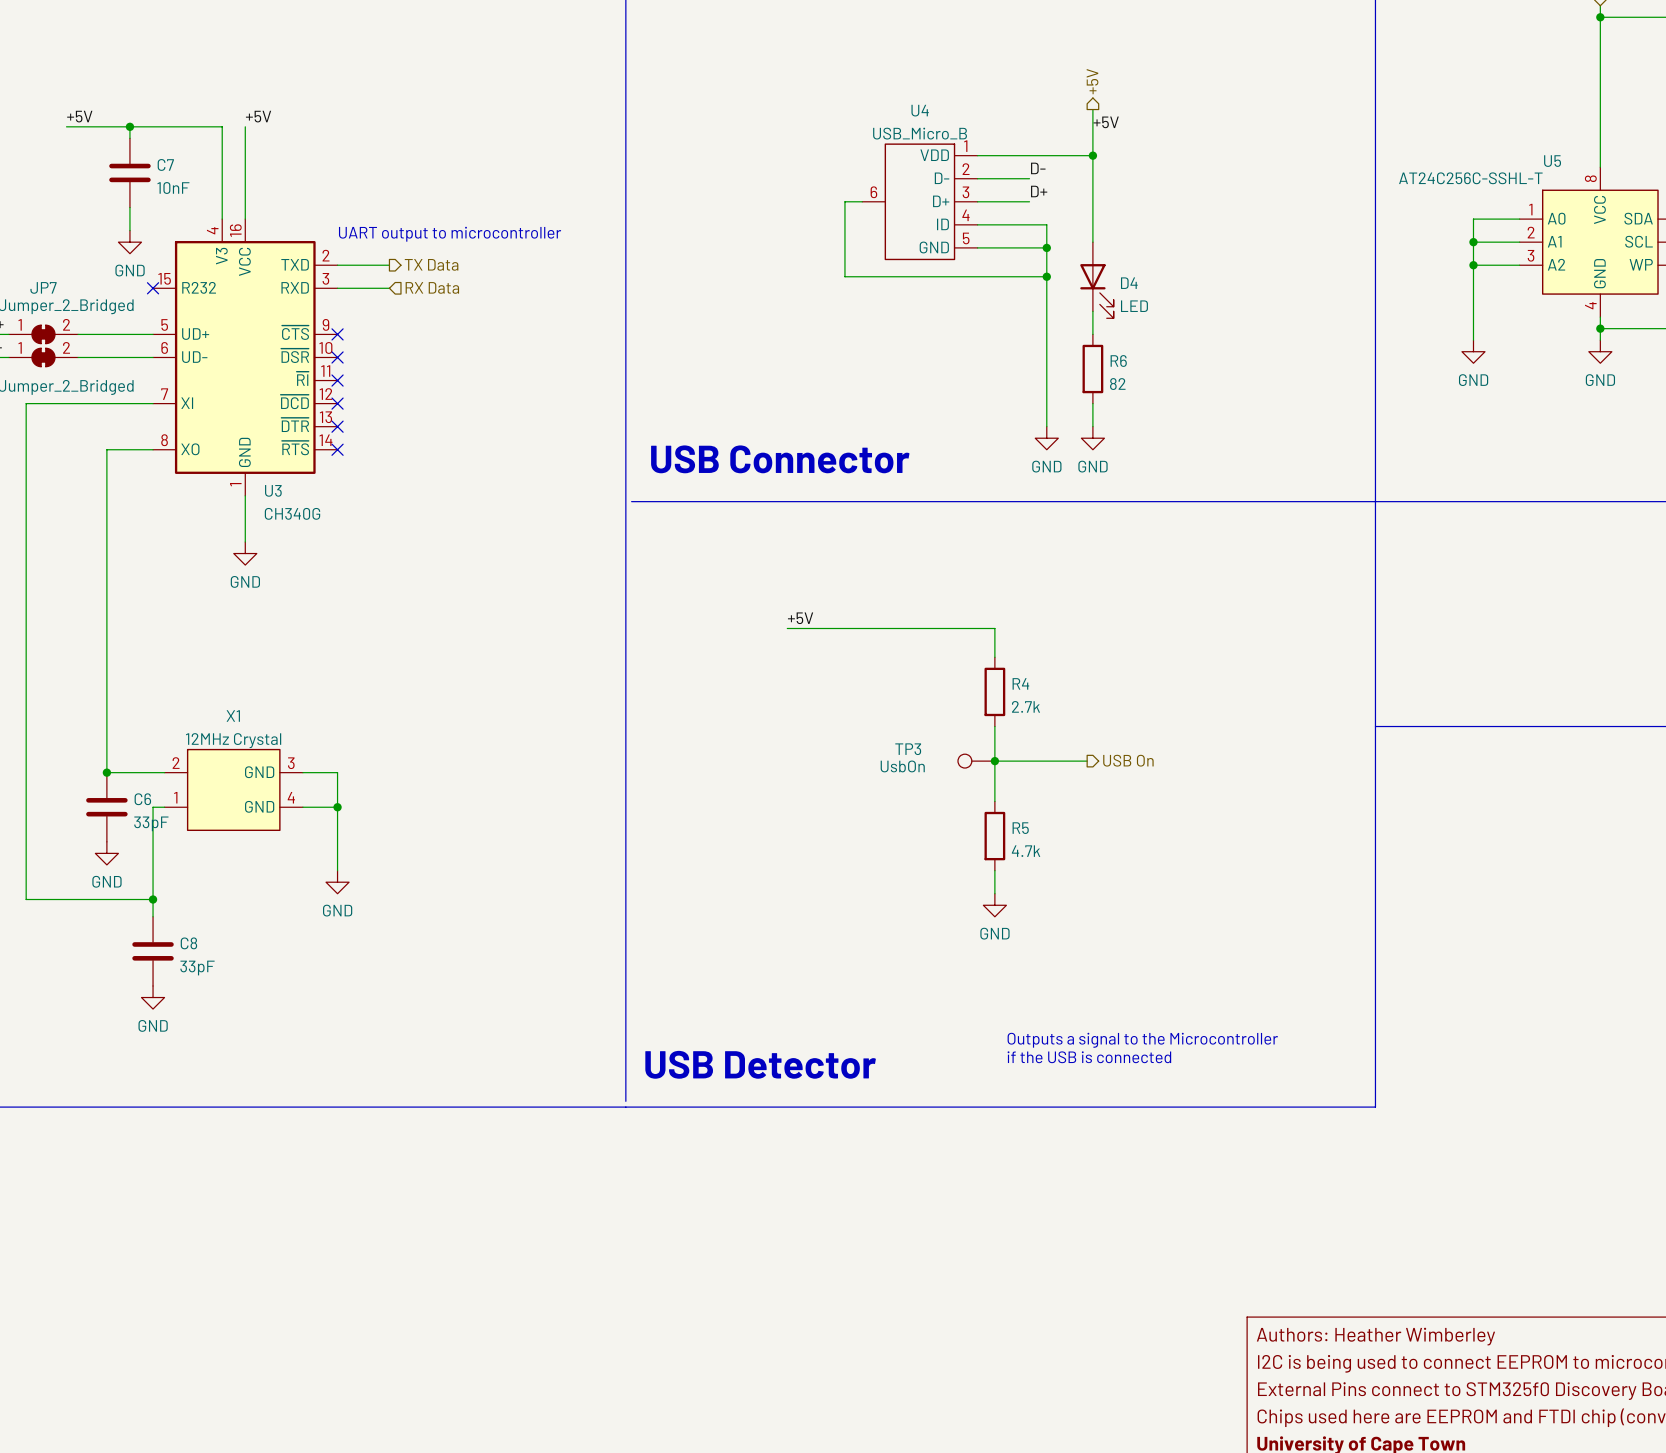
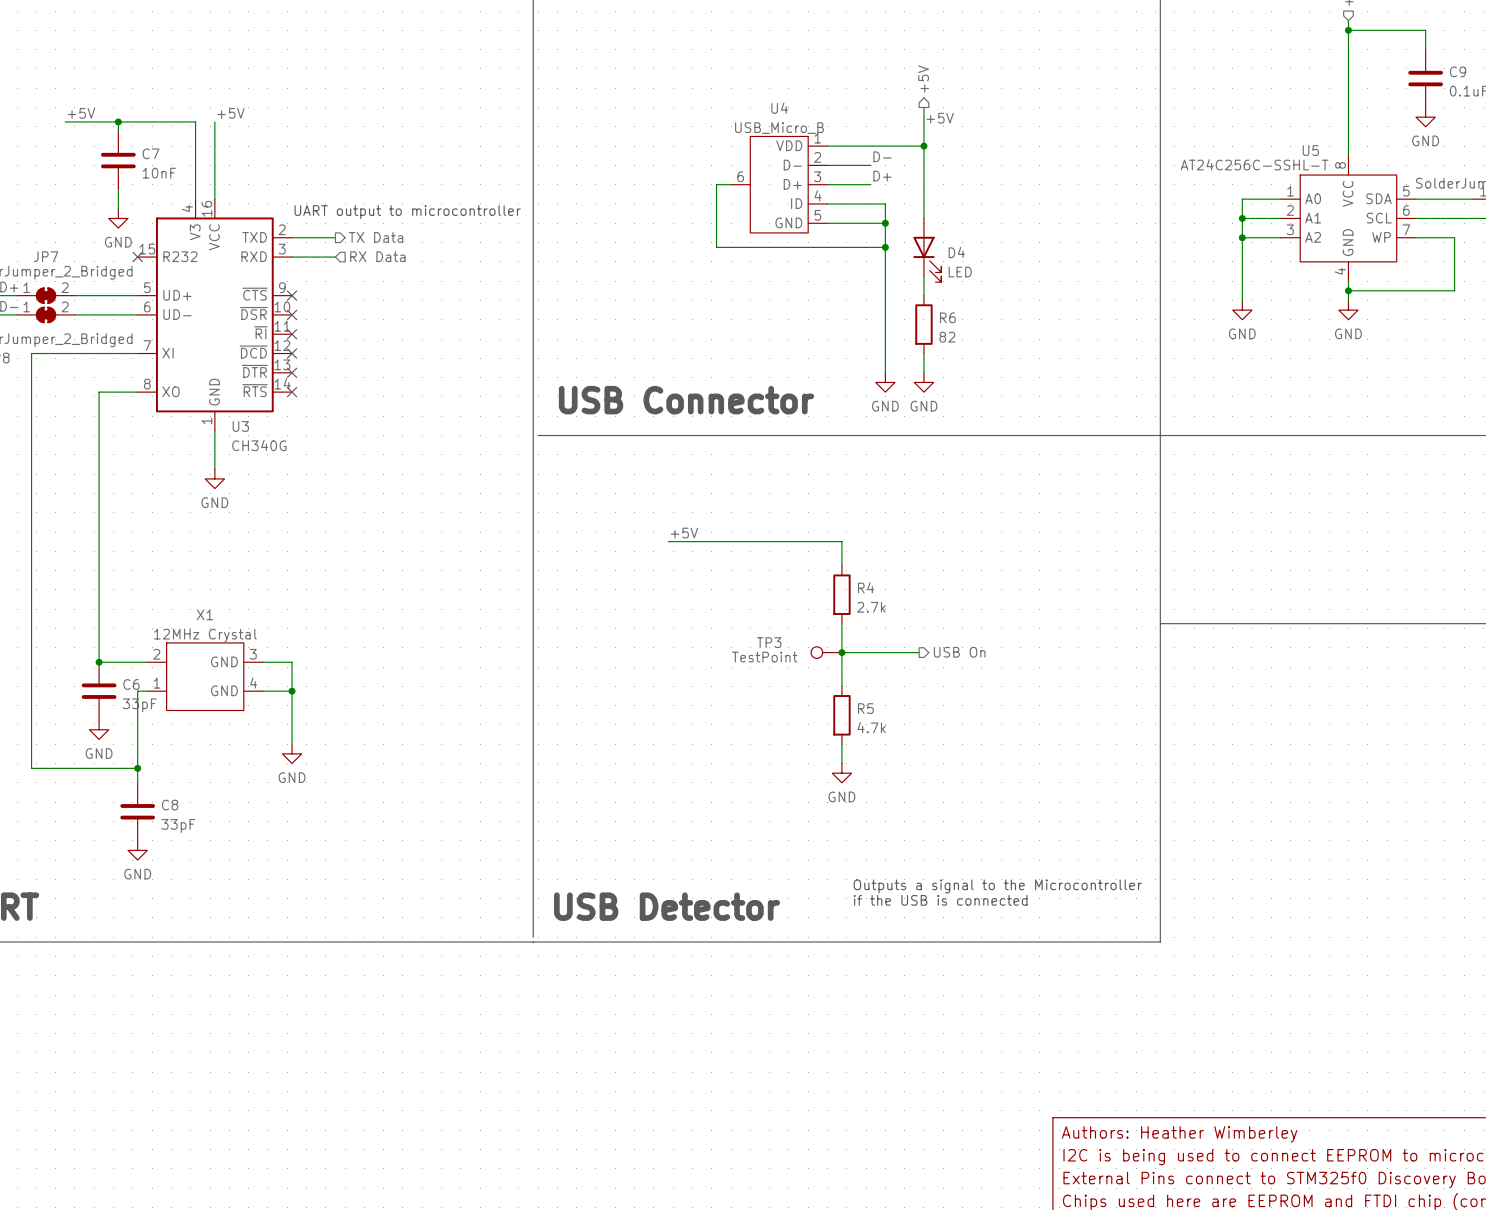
TP3 value: UsbOn (902, 766) -> TestPoint (764, 657)

